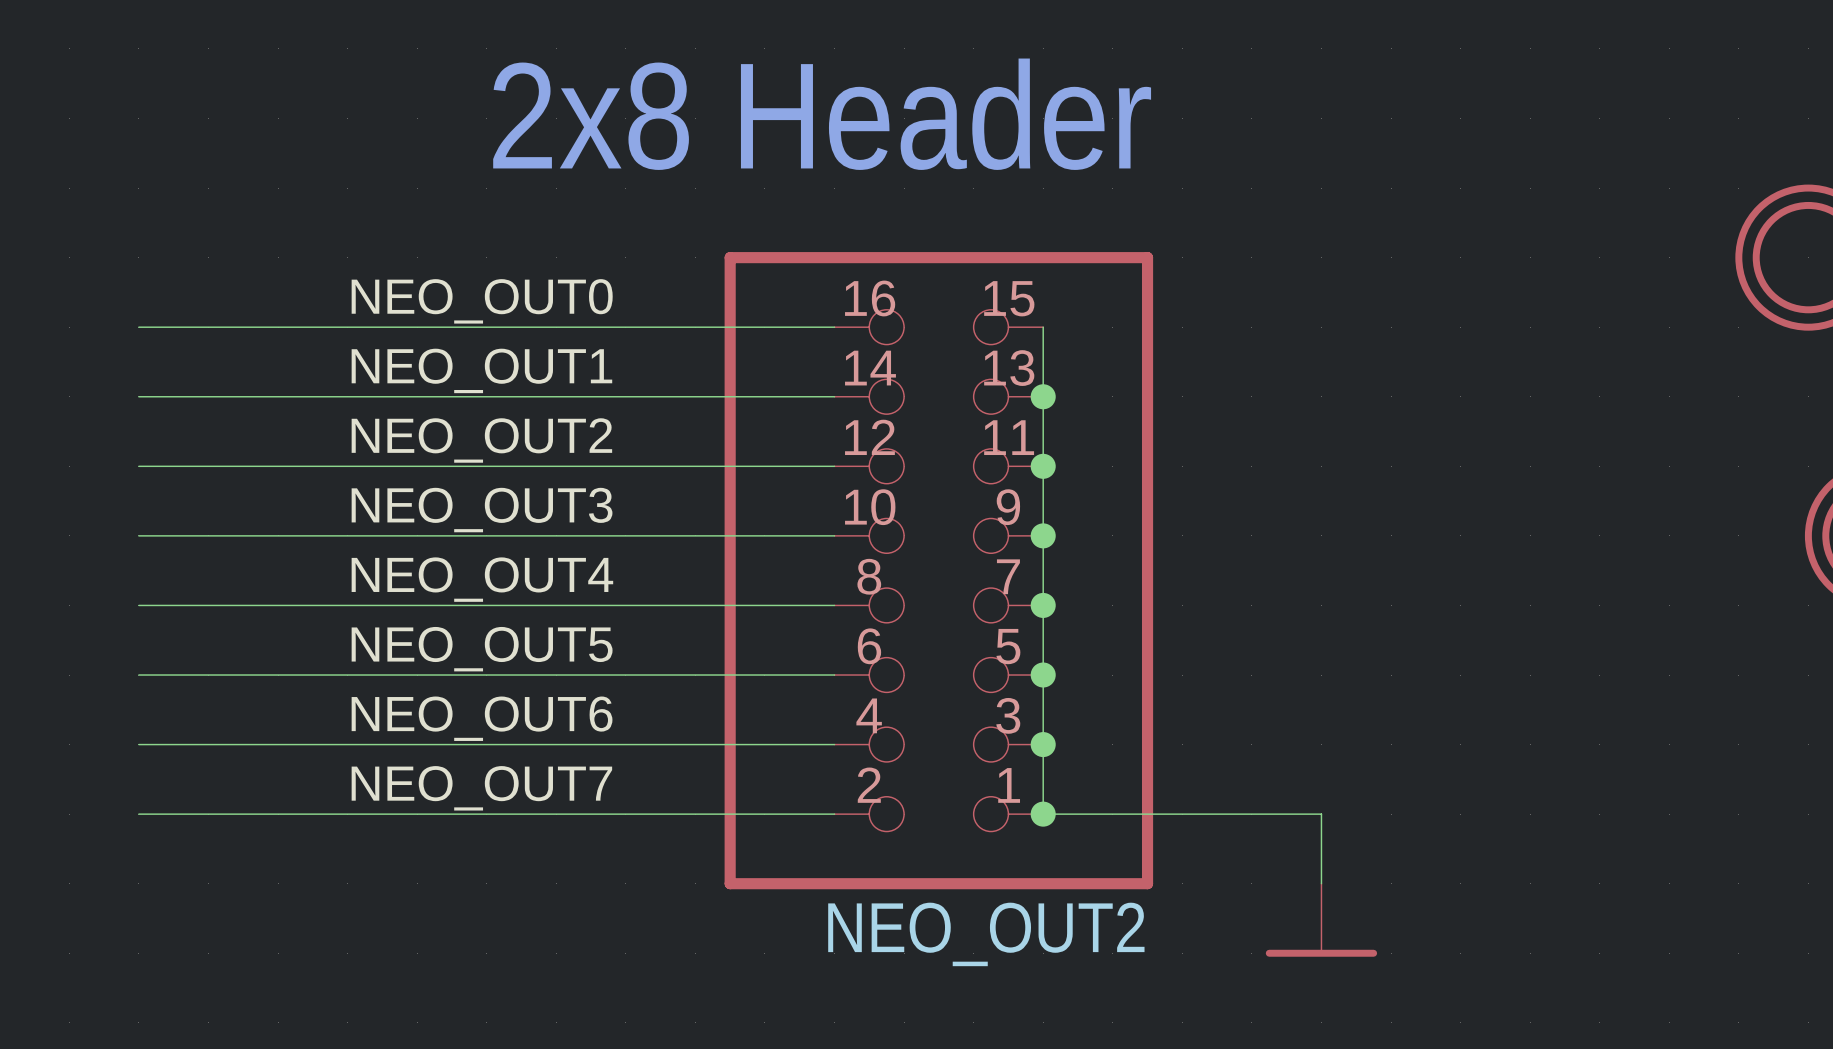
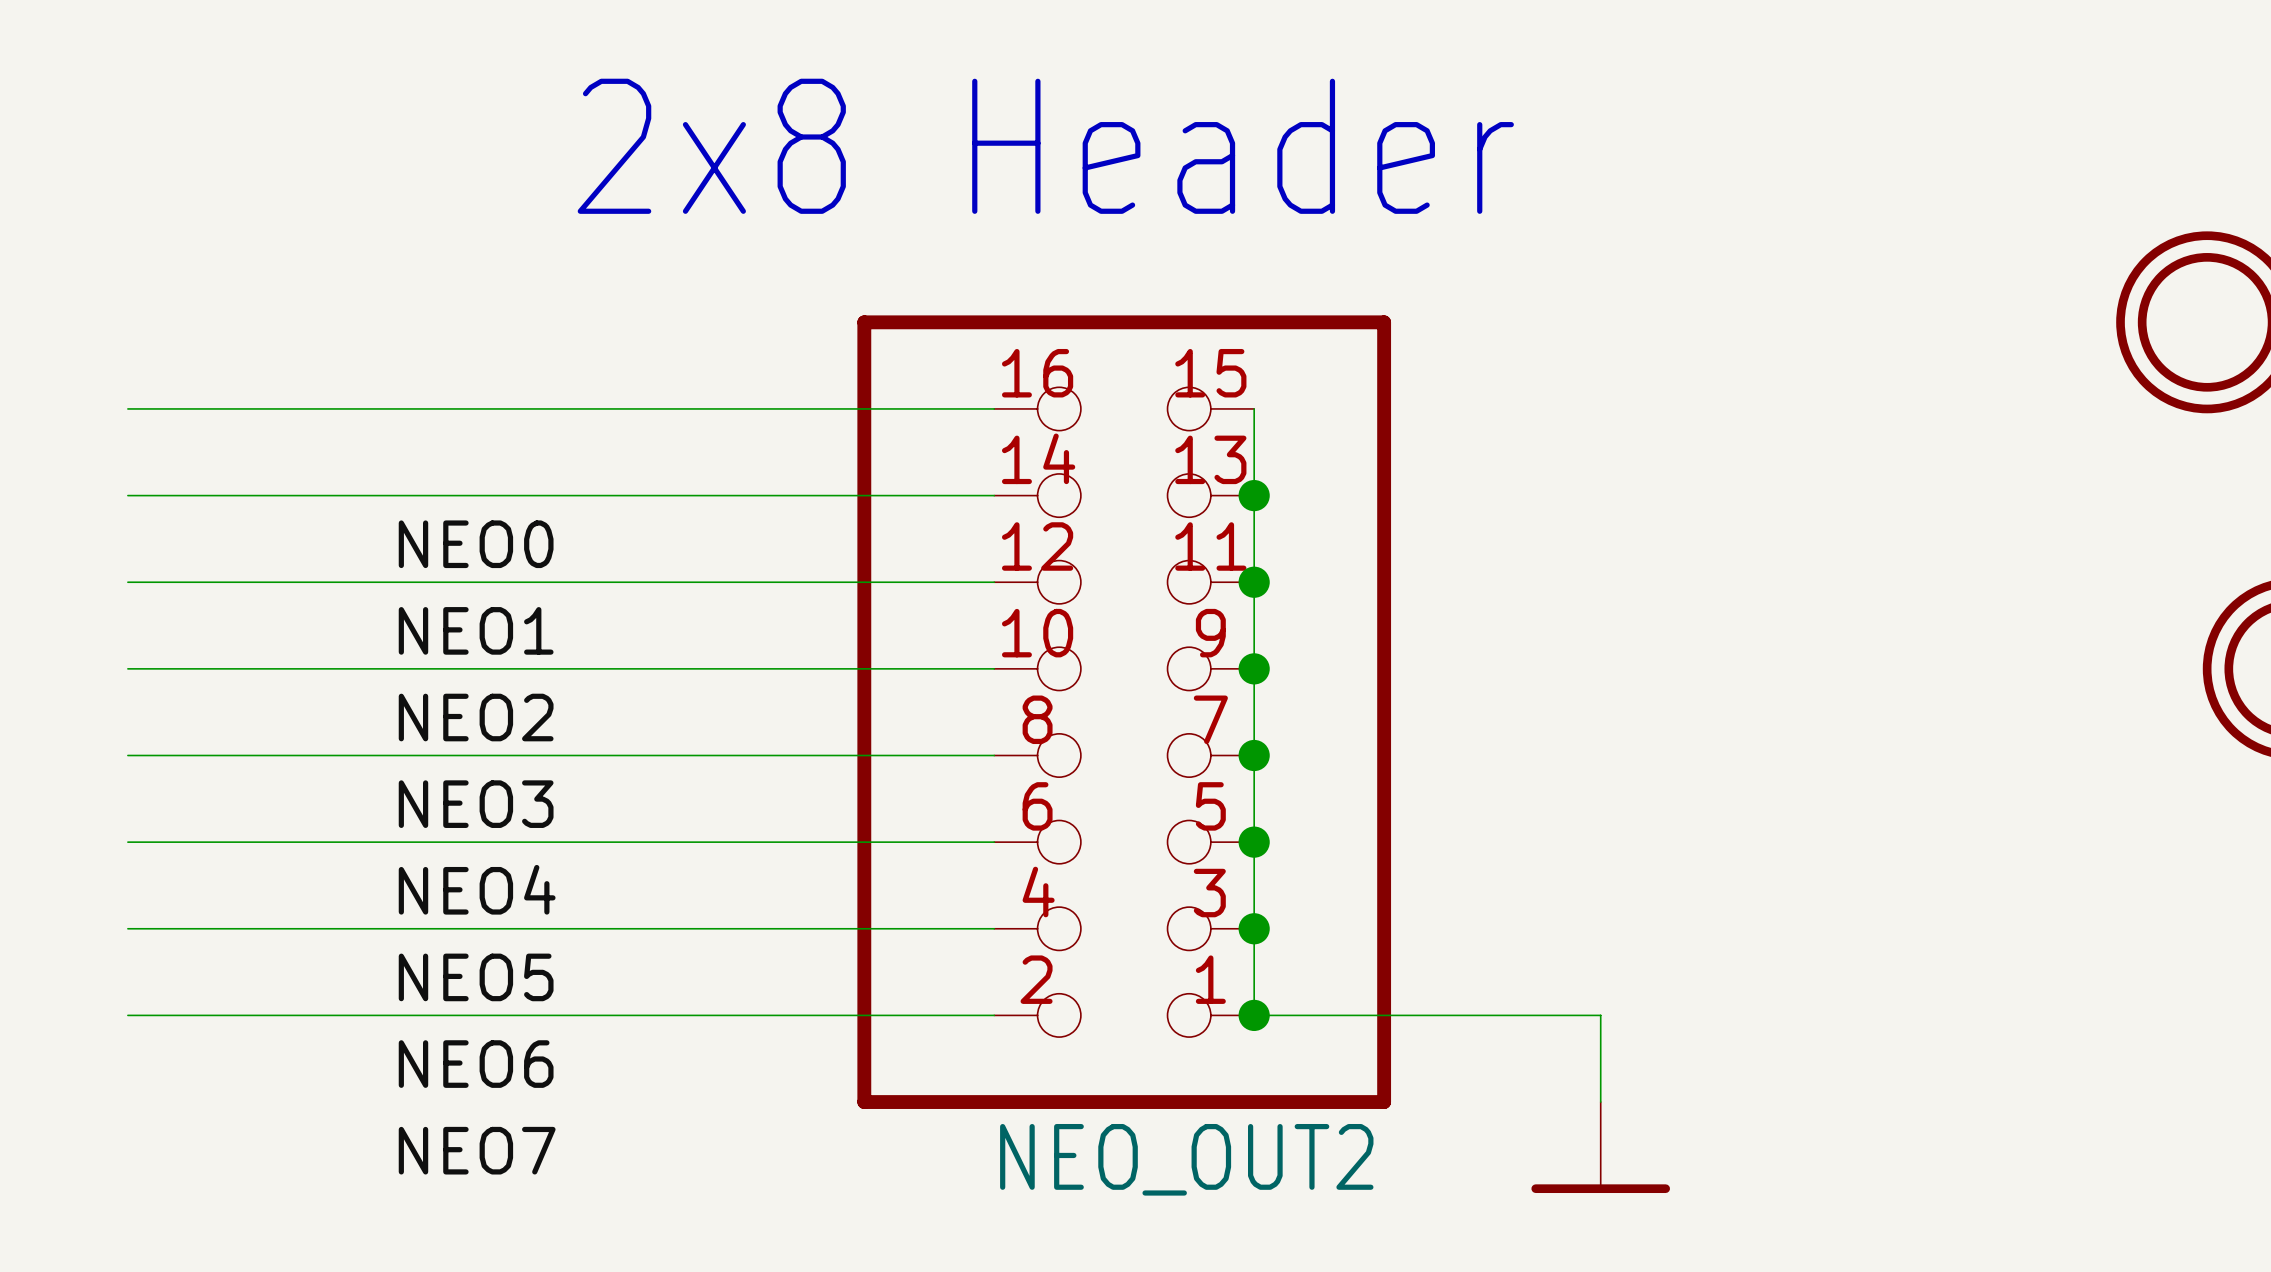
label: NEO_OUT0 (482, 301) -> none
label: NEO_OUT1 (481, 370) -> none
label: NEO_OUT2 (481, 440) -> NEO0 (476, 544)
label: NEO_OUT3 (482, 510) -> NEO1 (476, 630)
label: NEO_OUT4 (482, 579) -> NEO2 (476, 717)
label: NEO_OUT5 (482, 649) -> NEO3 (476, 804)
label: NEO_OUT6 (482, 718) -> NEO4 (477, 889)
label: NEO_OUT7 (481, 788) -> NEO5 (476, 977)
label: none -> NEO6 (476, 1064)
label: none -> NEO7 (477, 1150)

